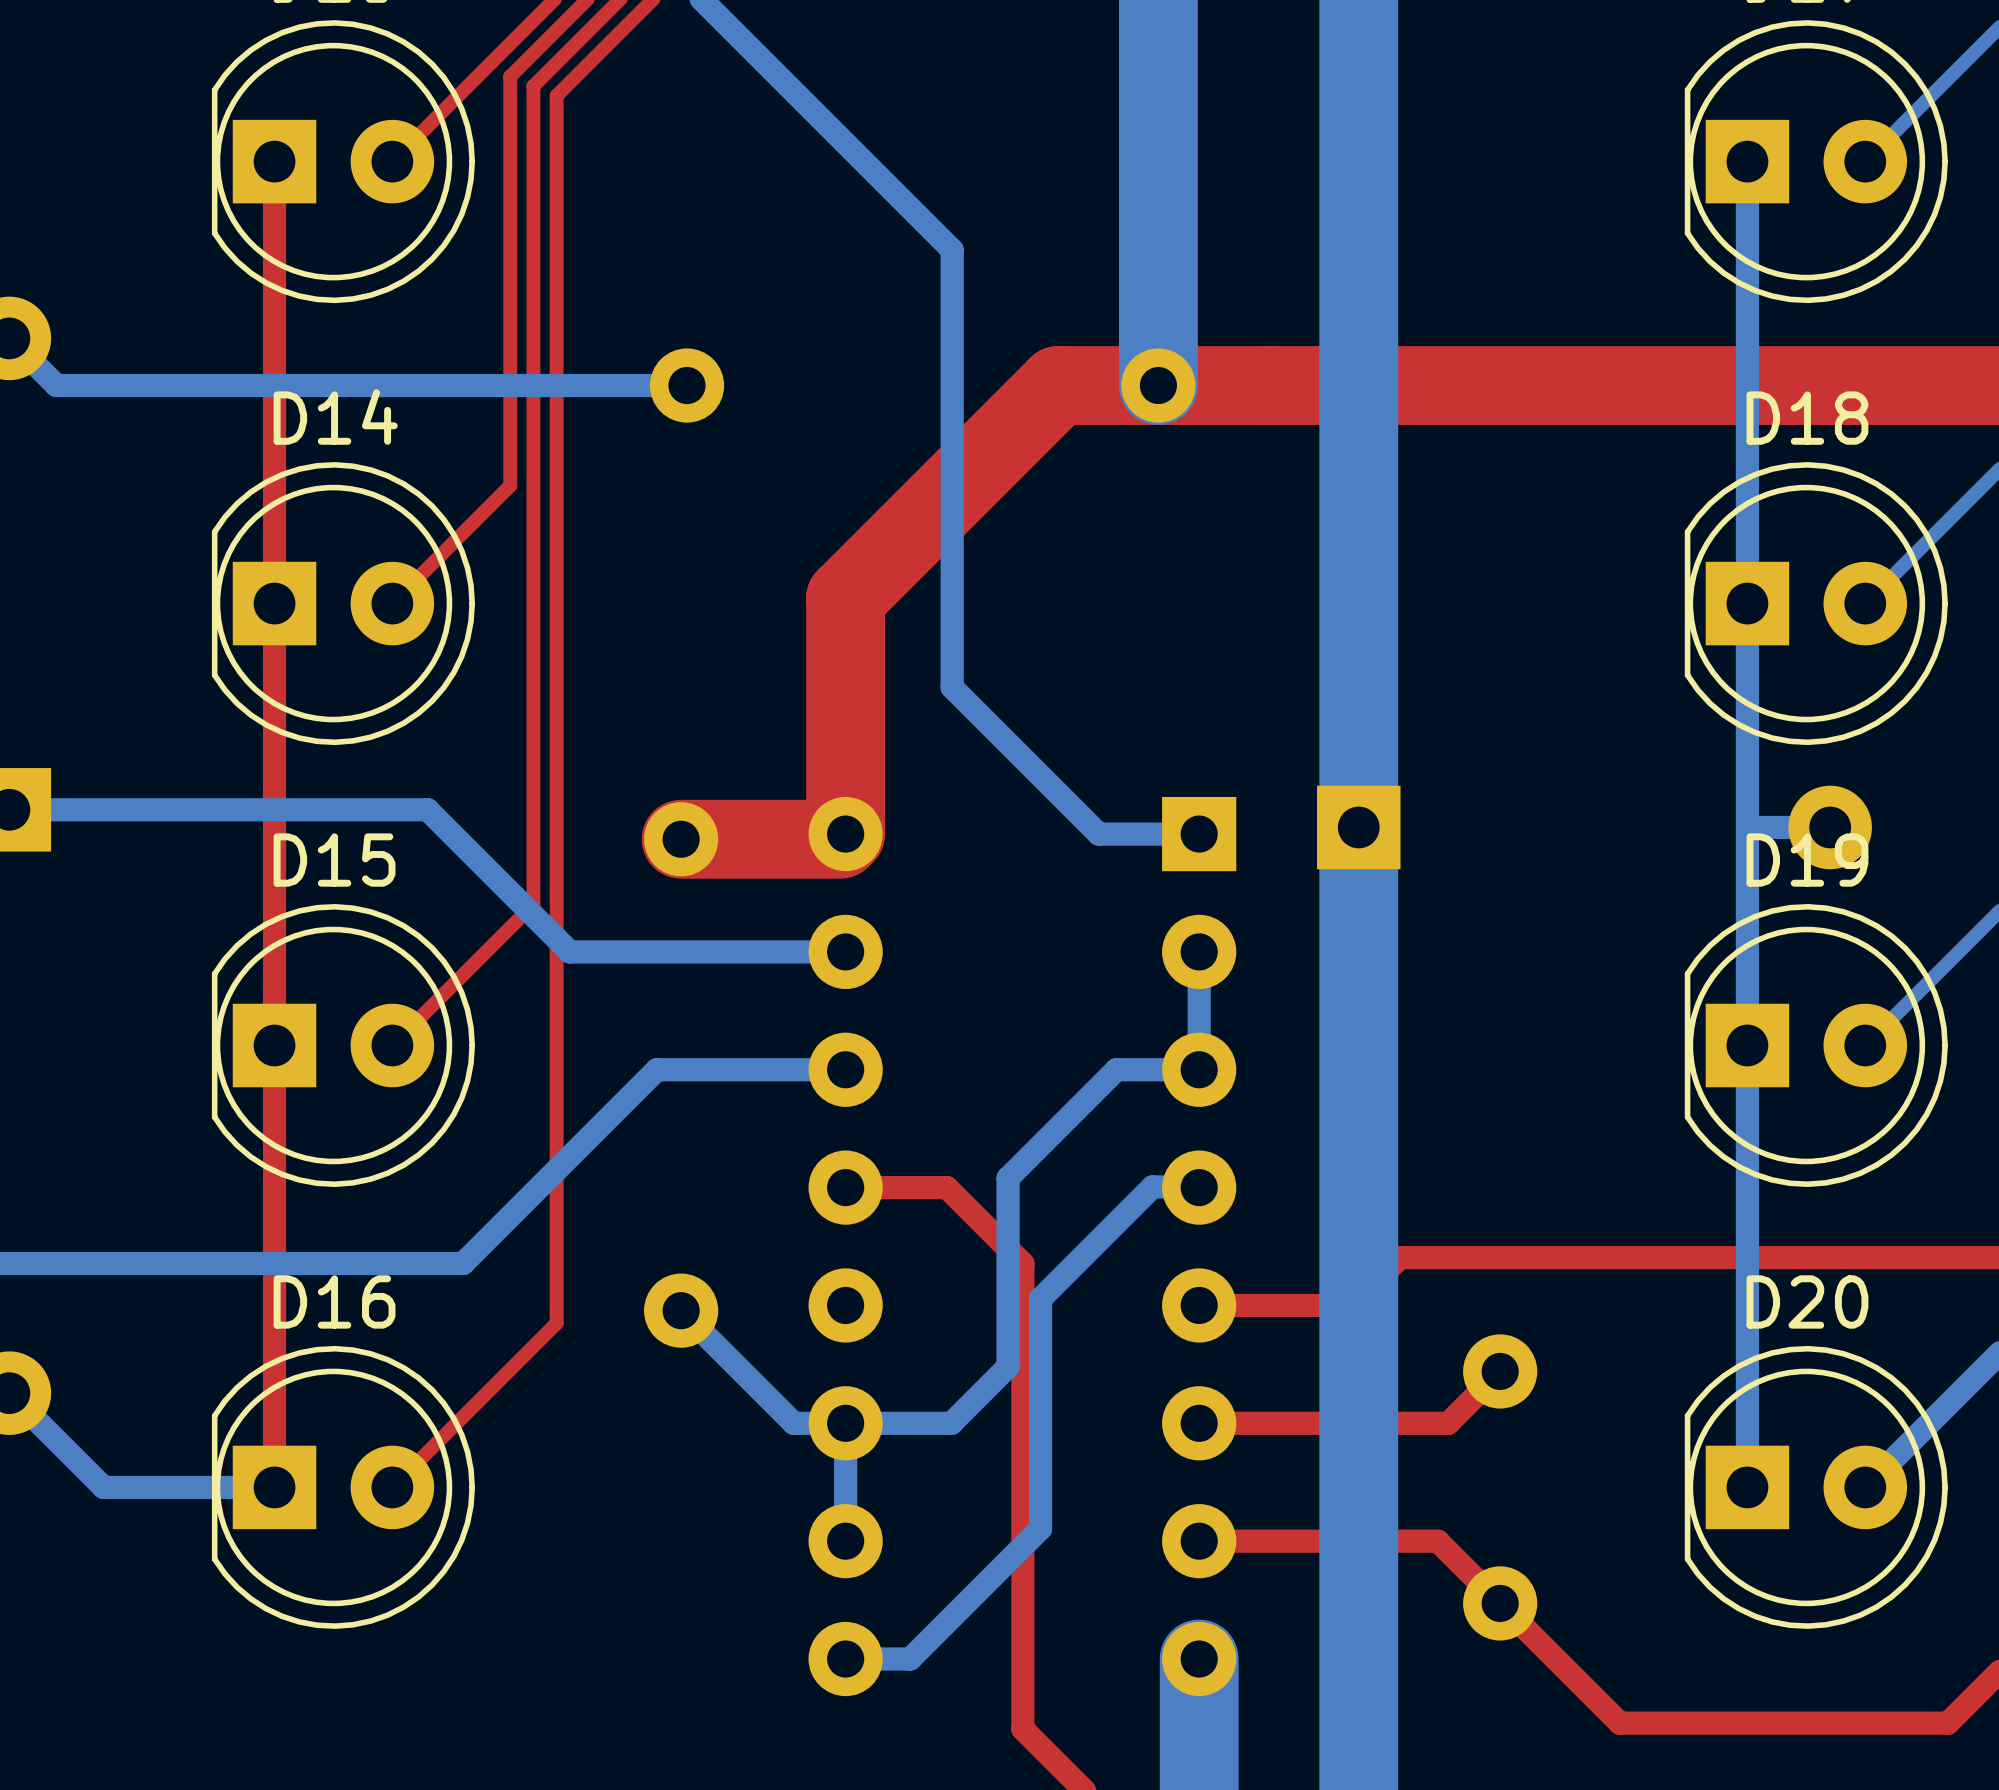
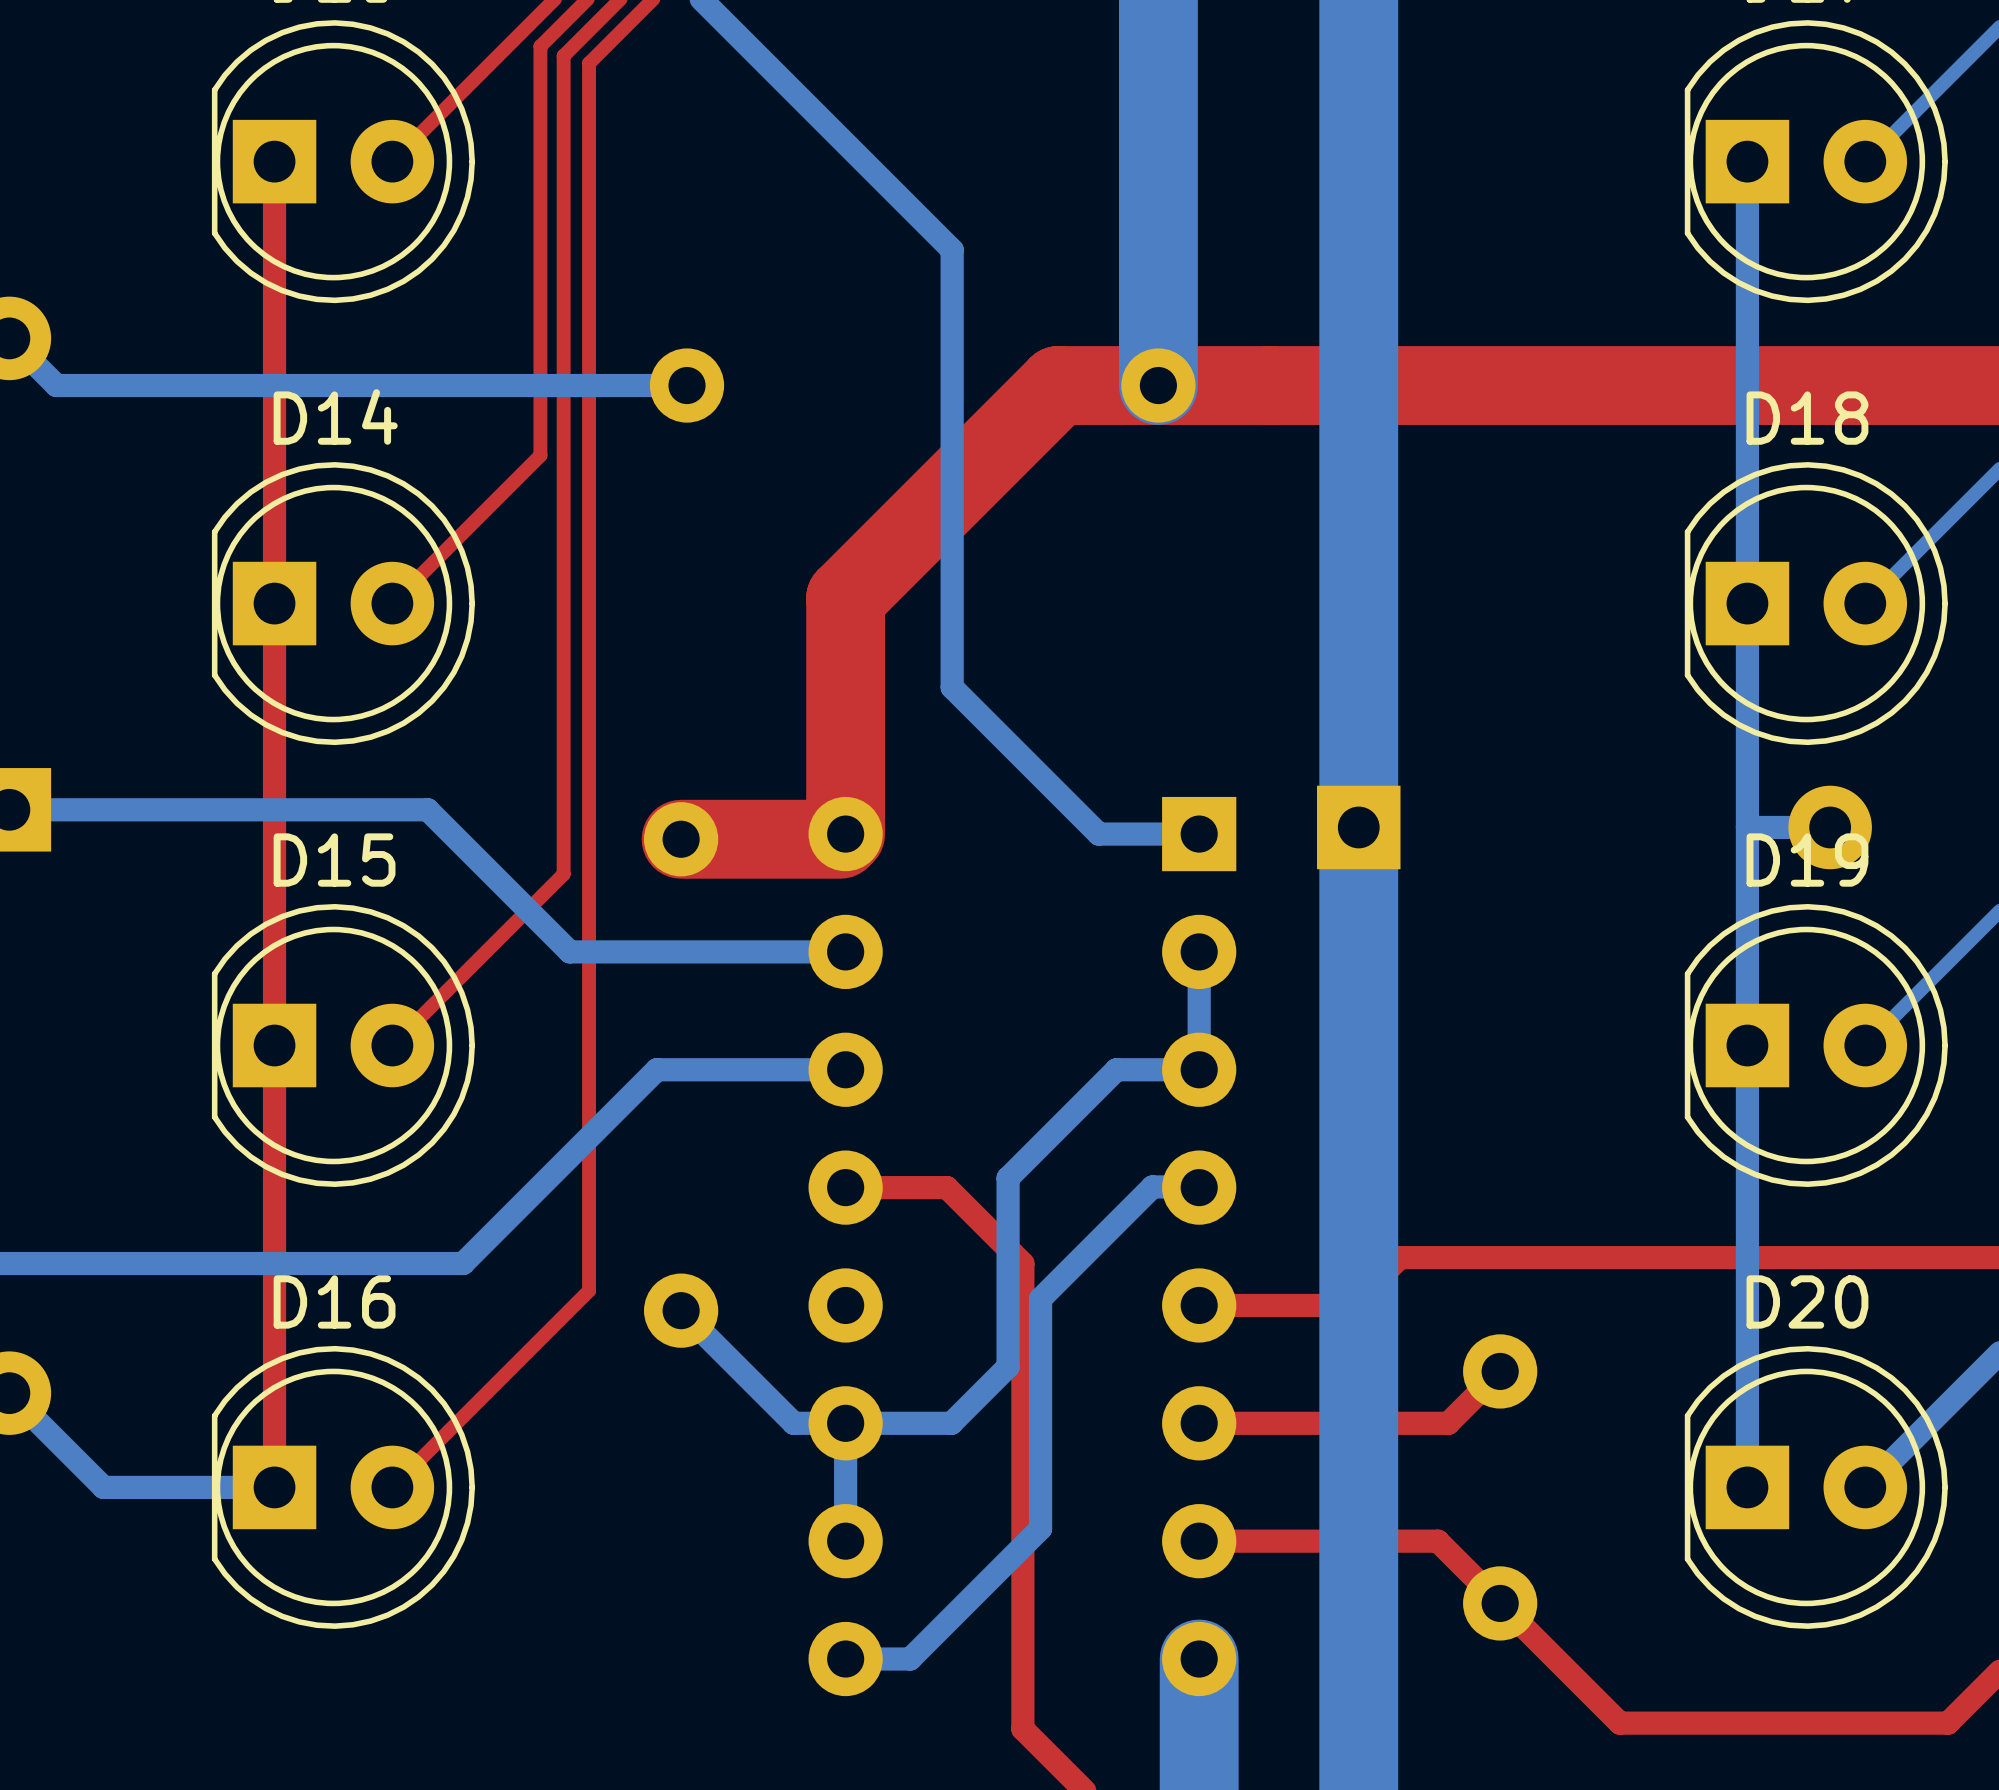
top track: (540, 46) (510, 76) (510, 485) -> (540, 46) (540, 455) (510, 485)
top track: (563, 55) (533, 86) (533, 904) -> (563, 55) (563, 874) (533, 904)
top track: (589, 63) (556, 95) (556, 1323) -> (589, 63) (589, 1290) (556, 1323)

